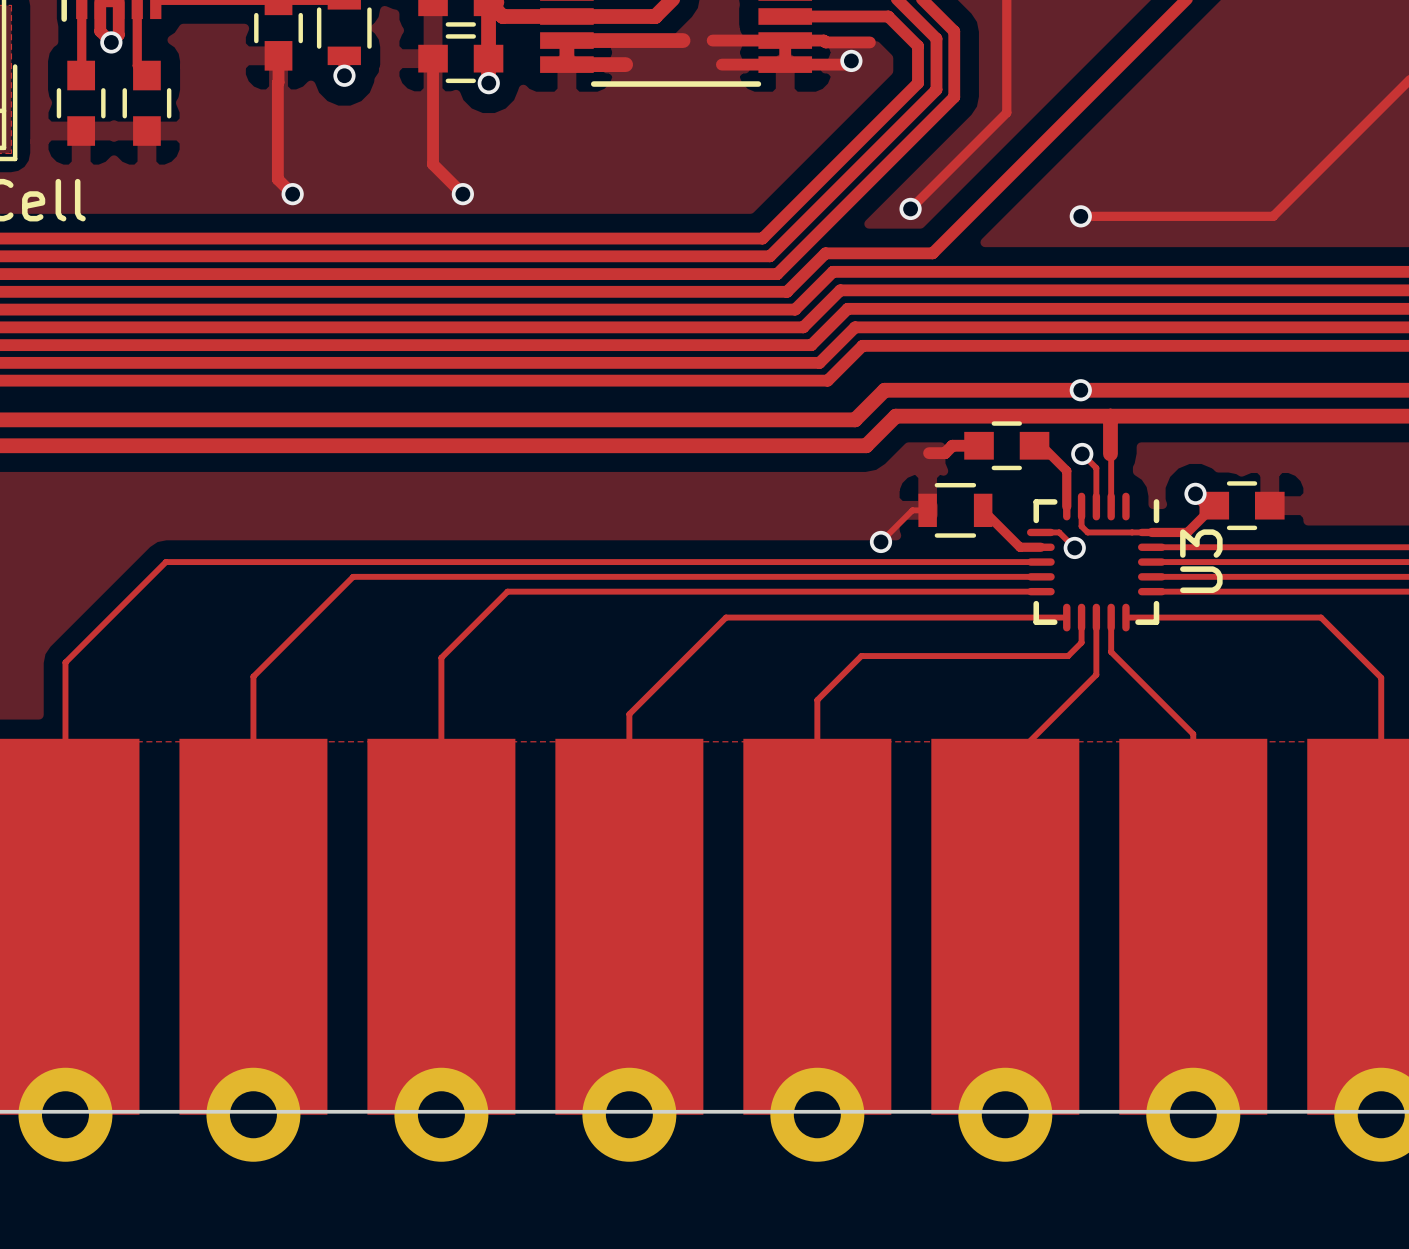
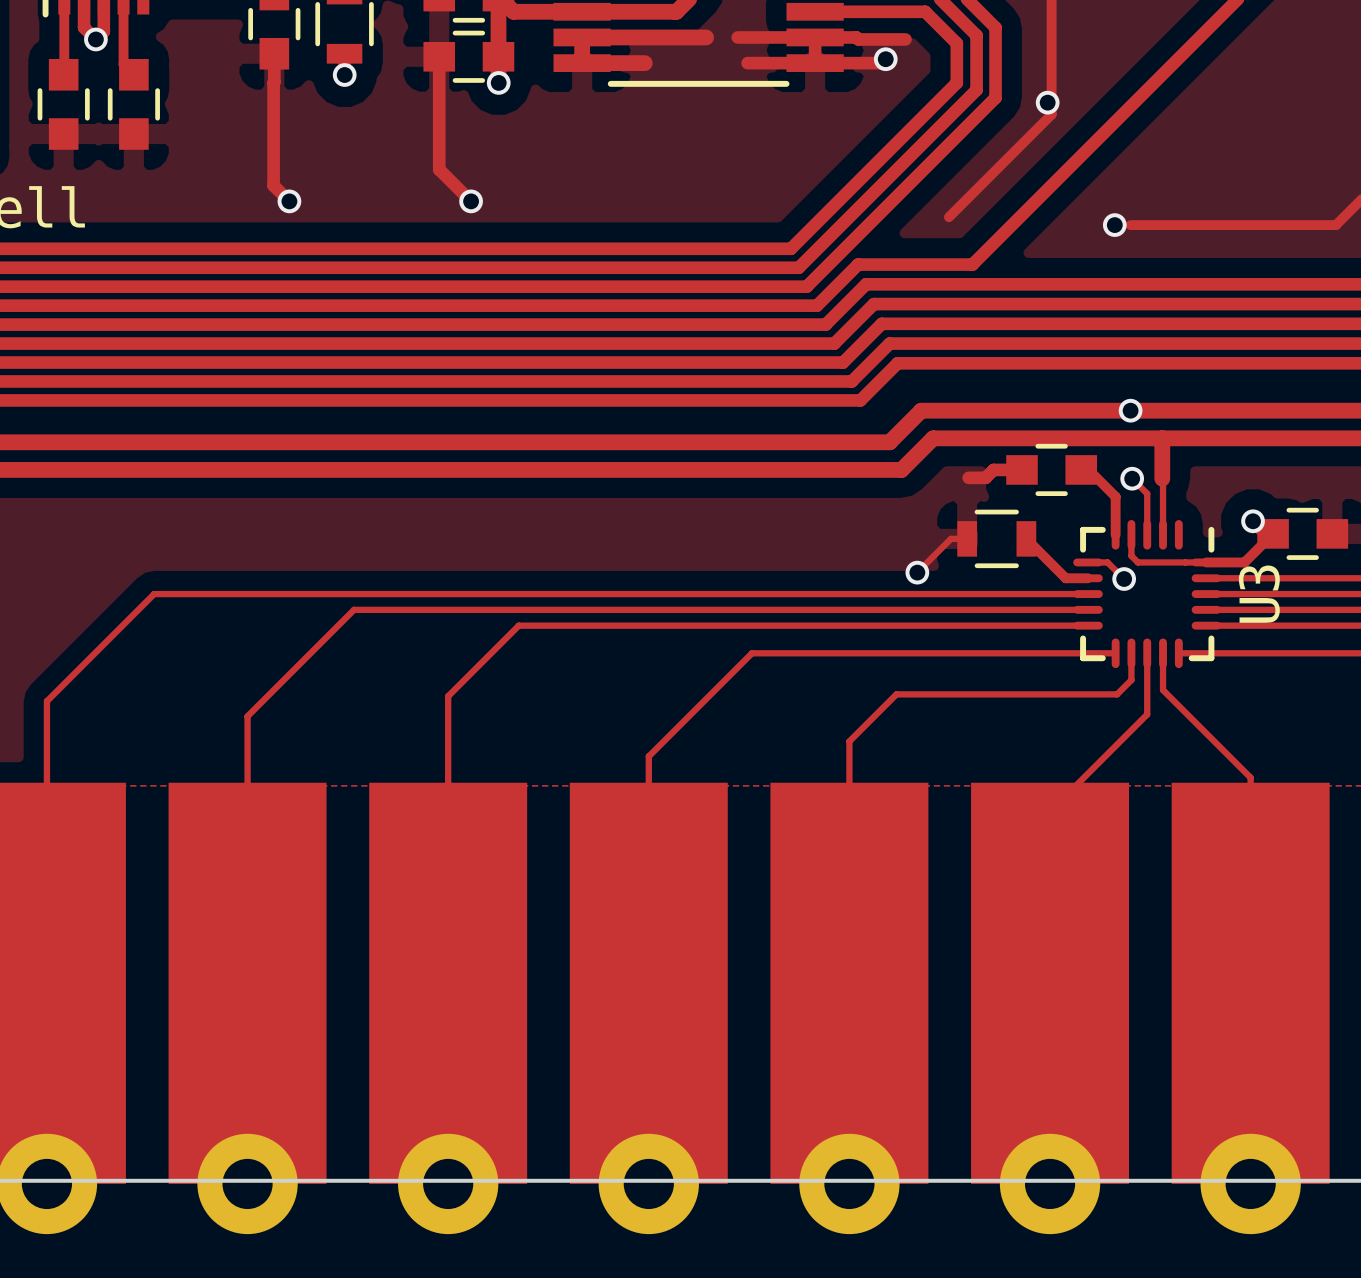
via: none -> (1047, 102)
via: (910, 208) -> none
via position: (1080, 216) -> (1114, 225)

